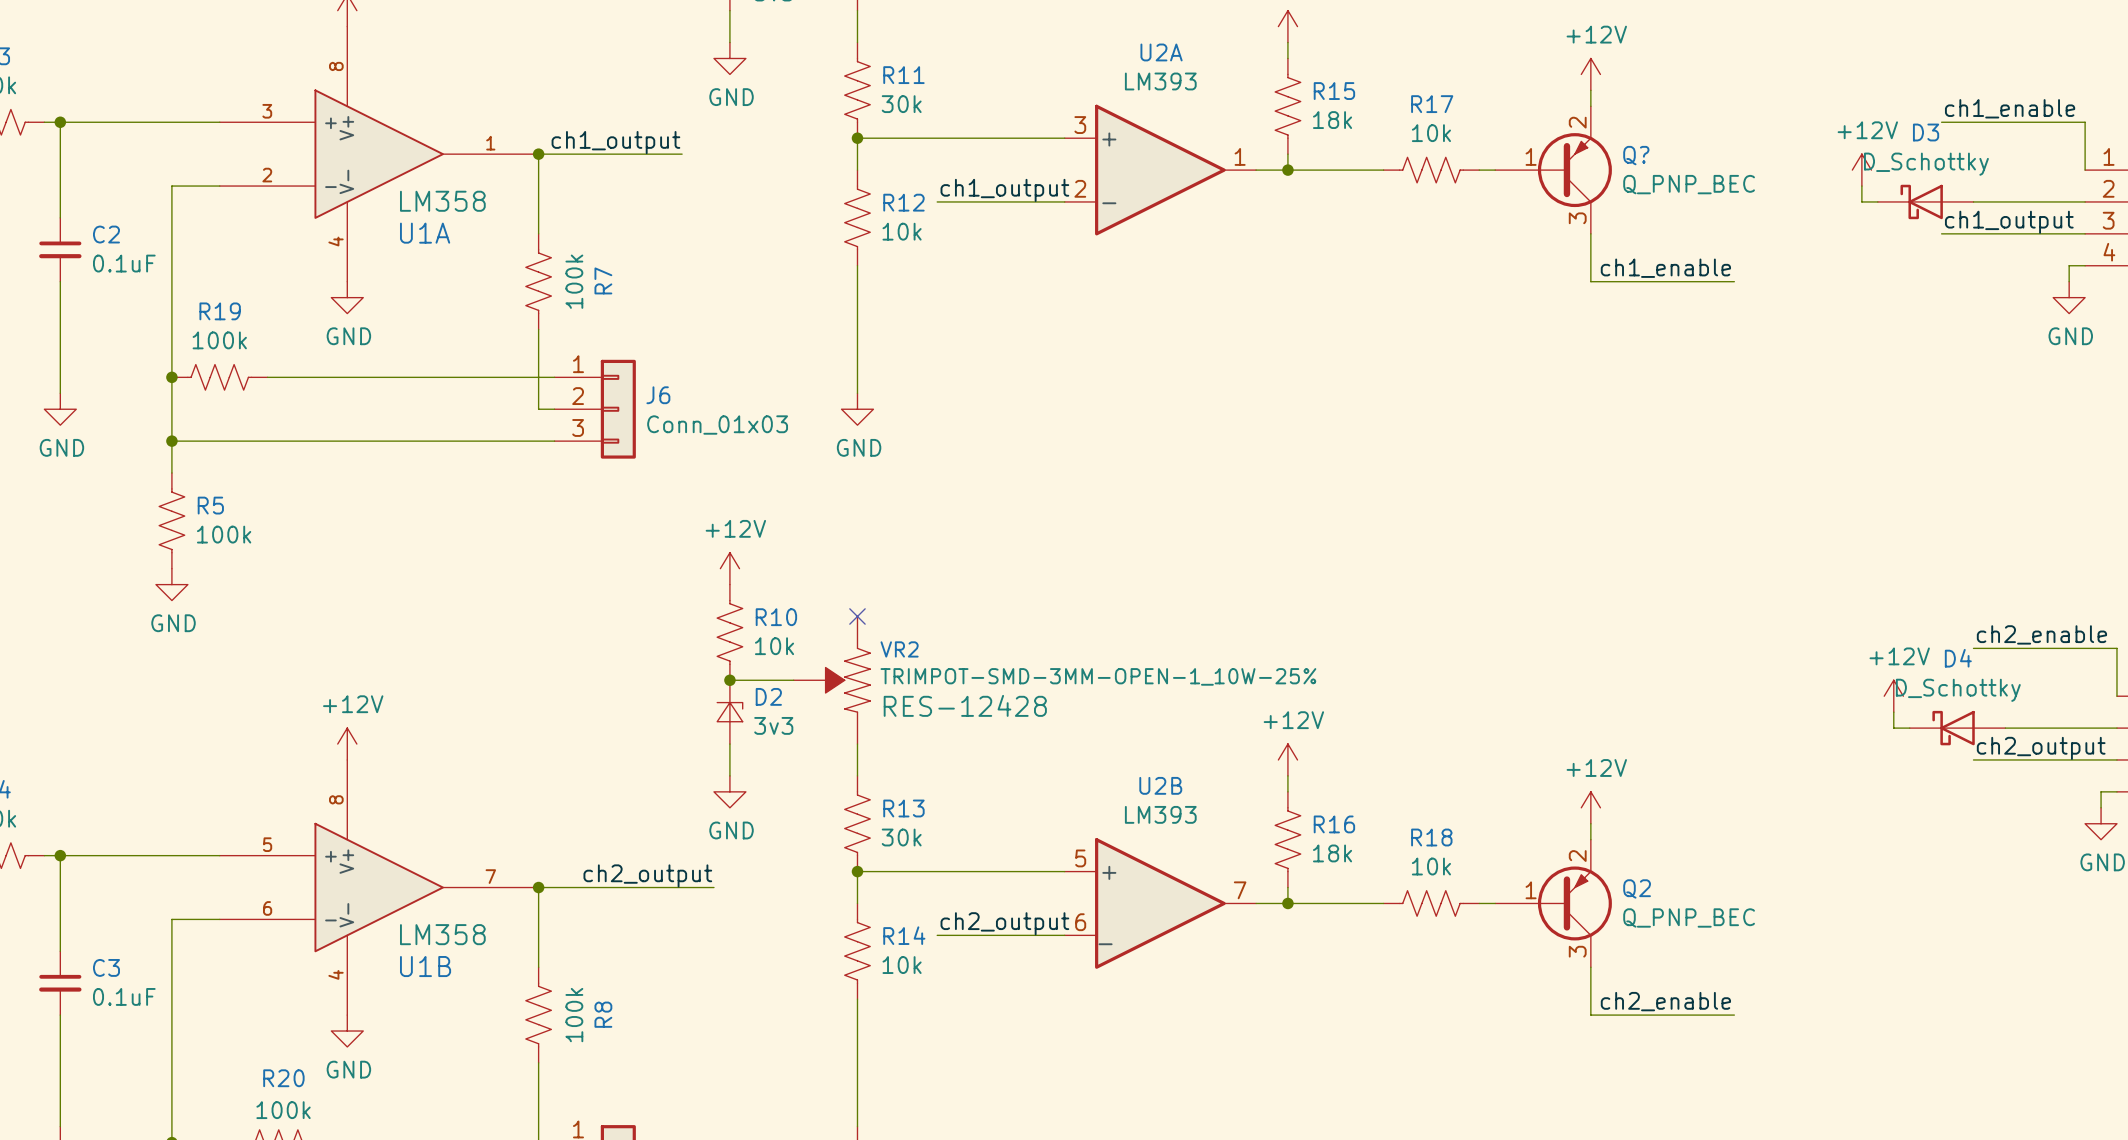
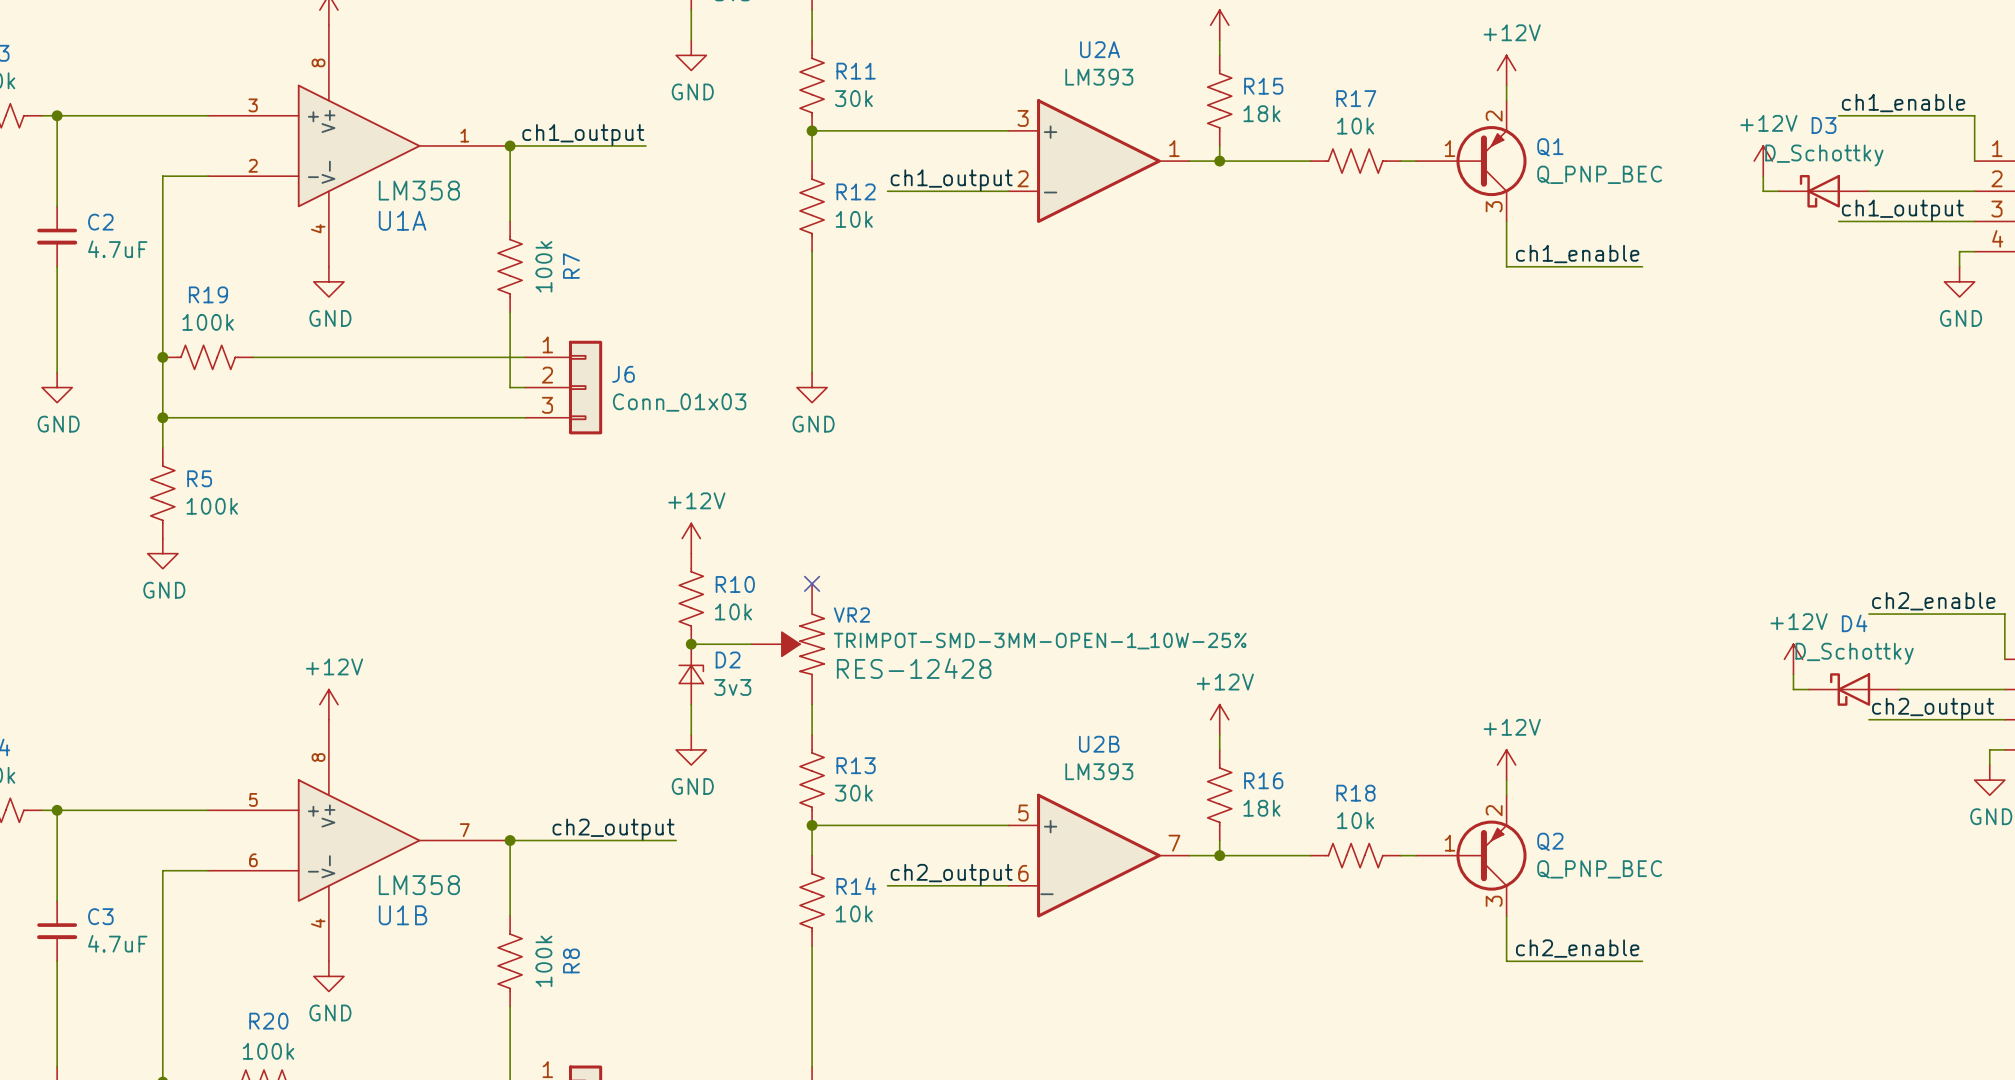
Q? name: Q? (1636, 155) -> Q1 (1550, 147)
C2 value: 0.1uF (124, 263) -> 4.7uF (117, 249)
C3 value: 0.1uF (124, 996) -> 4.7uF (117, 943)

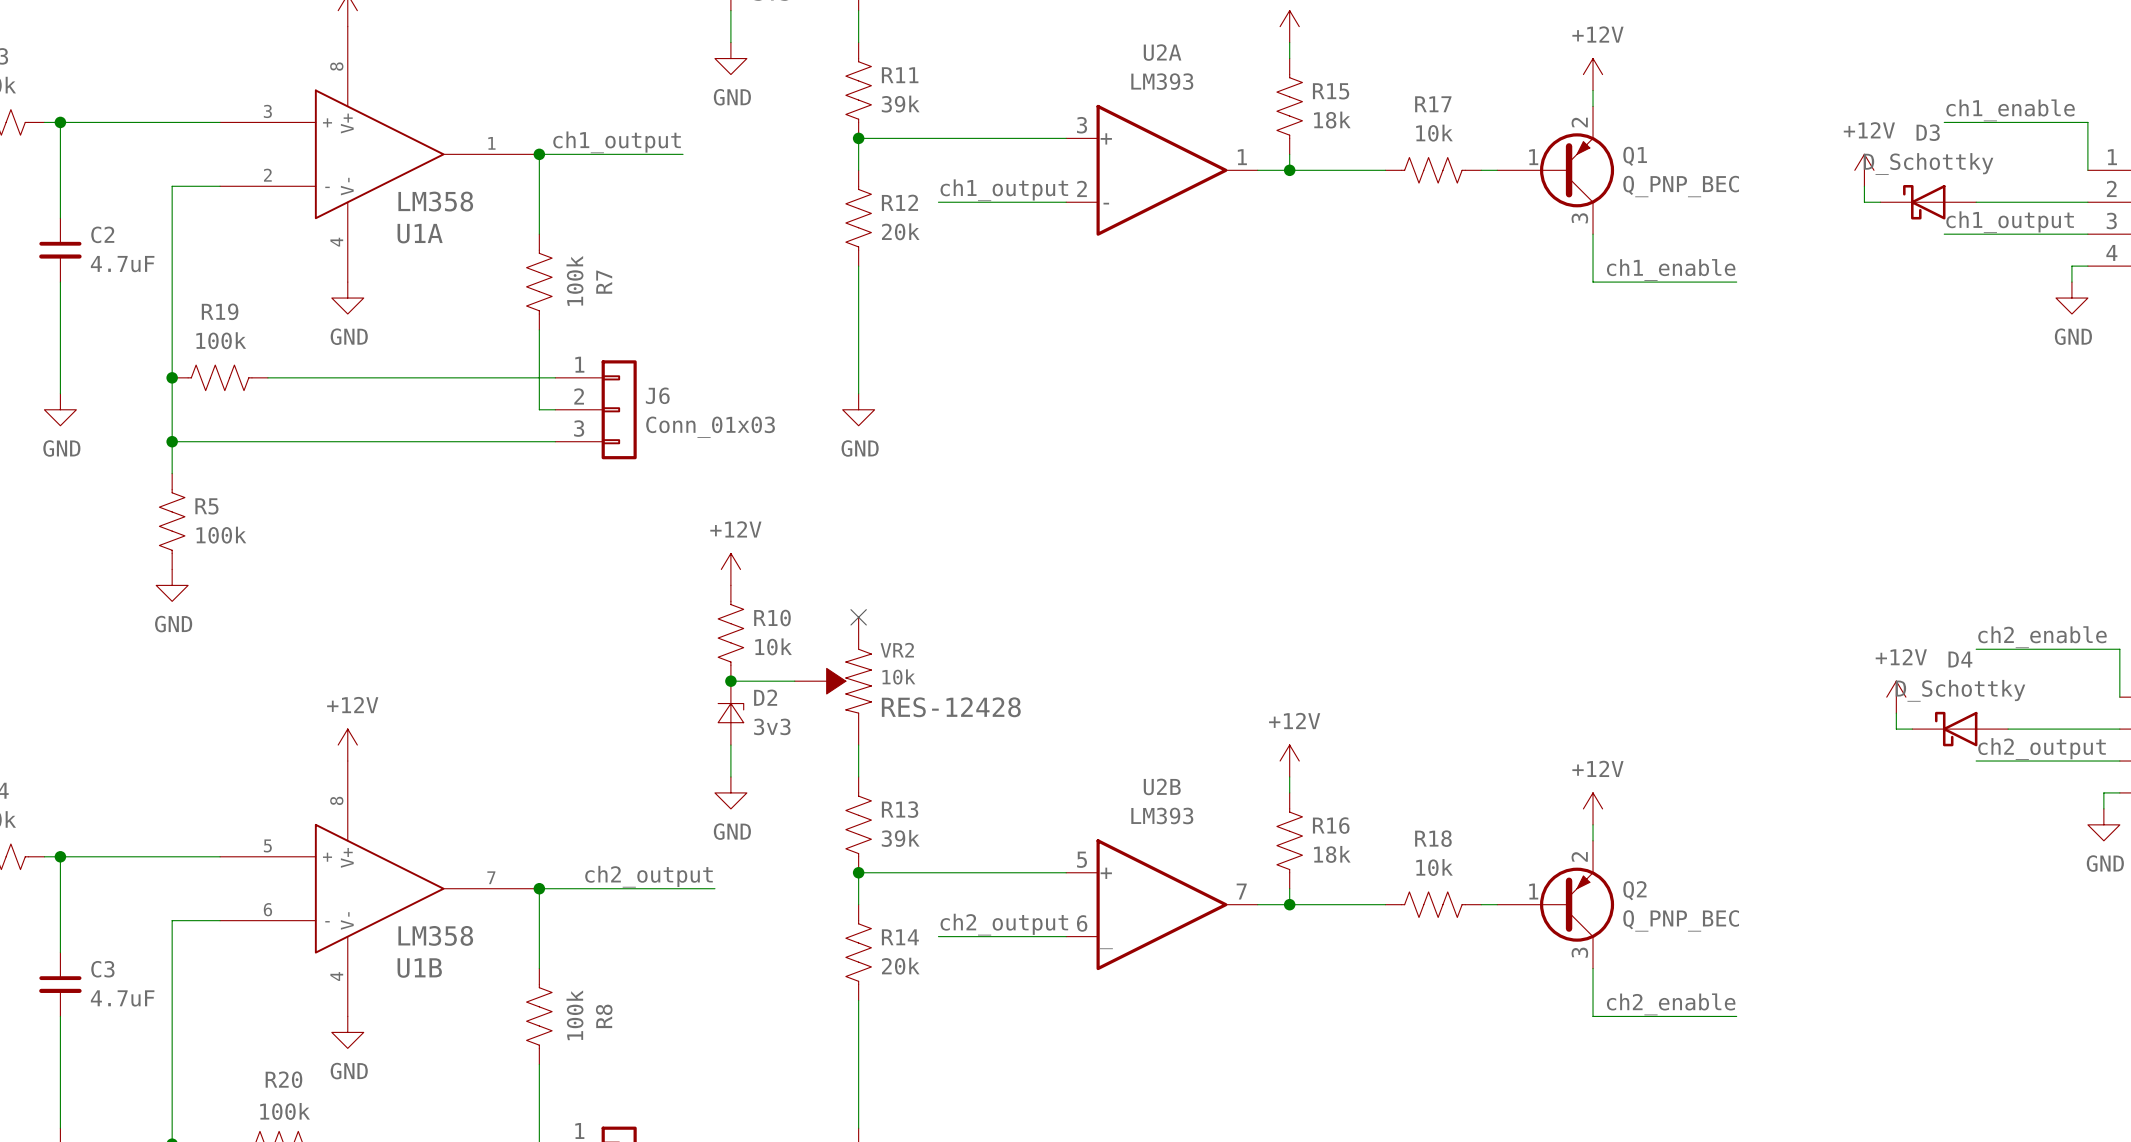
R11 value: 30k (853, 98) -> 39k (900, 104)
R12 value: 10k (854, 219) -> 20k (900, 231)
VR2 value: TRIMPOT-SMD-3MM-OPEN-1_10W-25% (1040, 641) -> 10k (898, 676)
R13 value: 30k (853, 793) -> 39k (900, 838)
R14 value: 10k (854, 913) -> 20k (900, 966)

